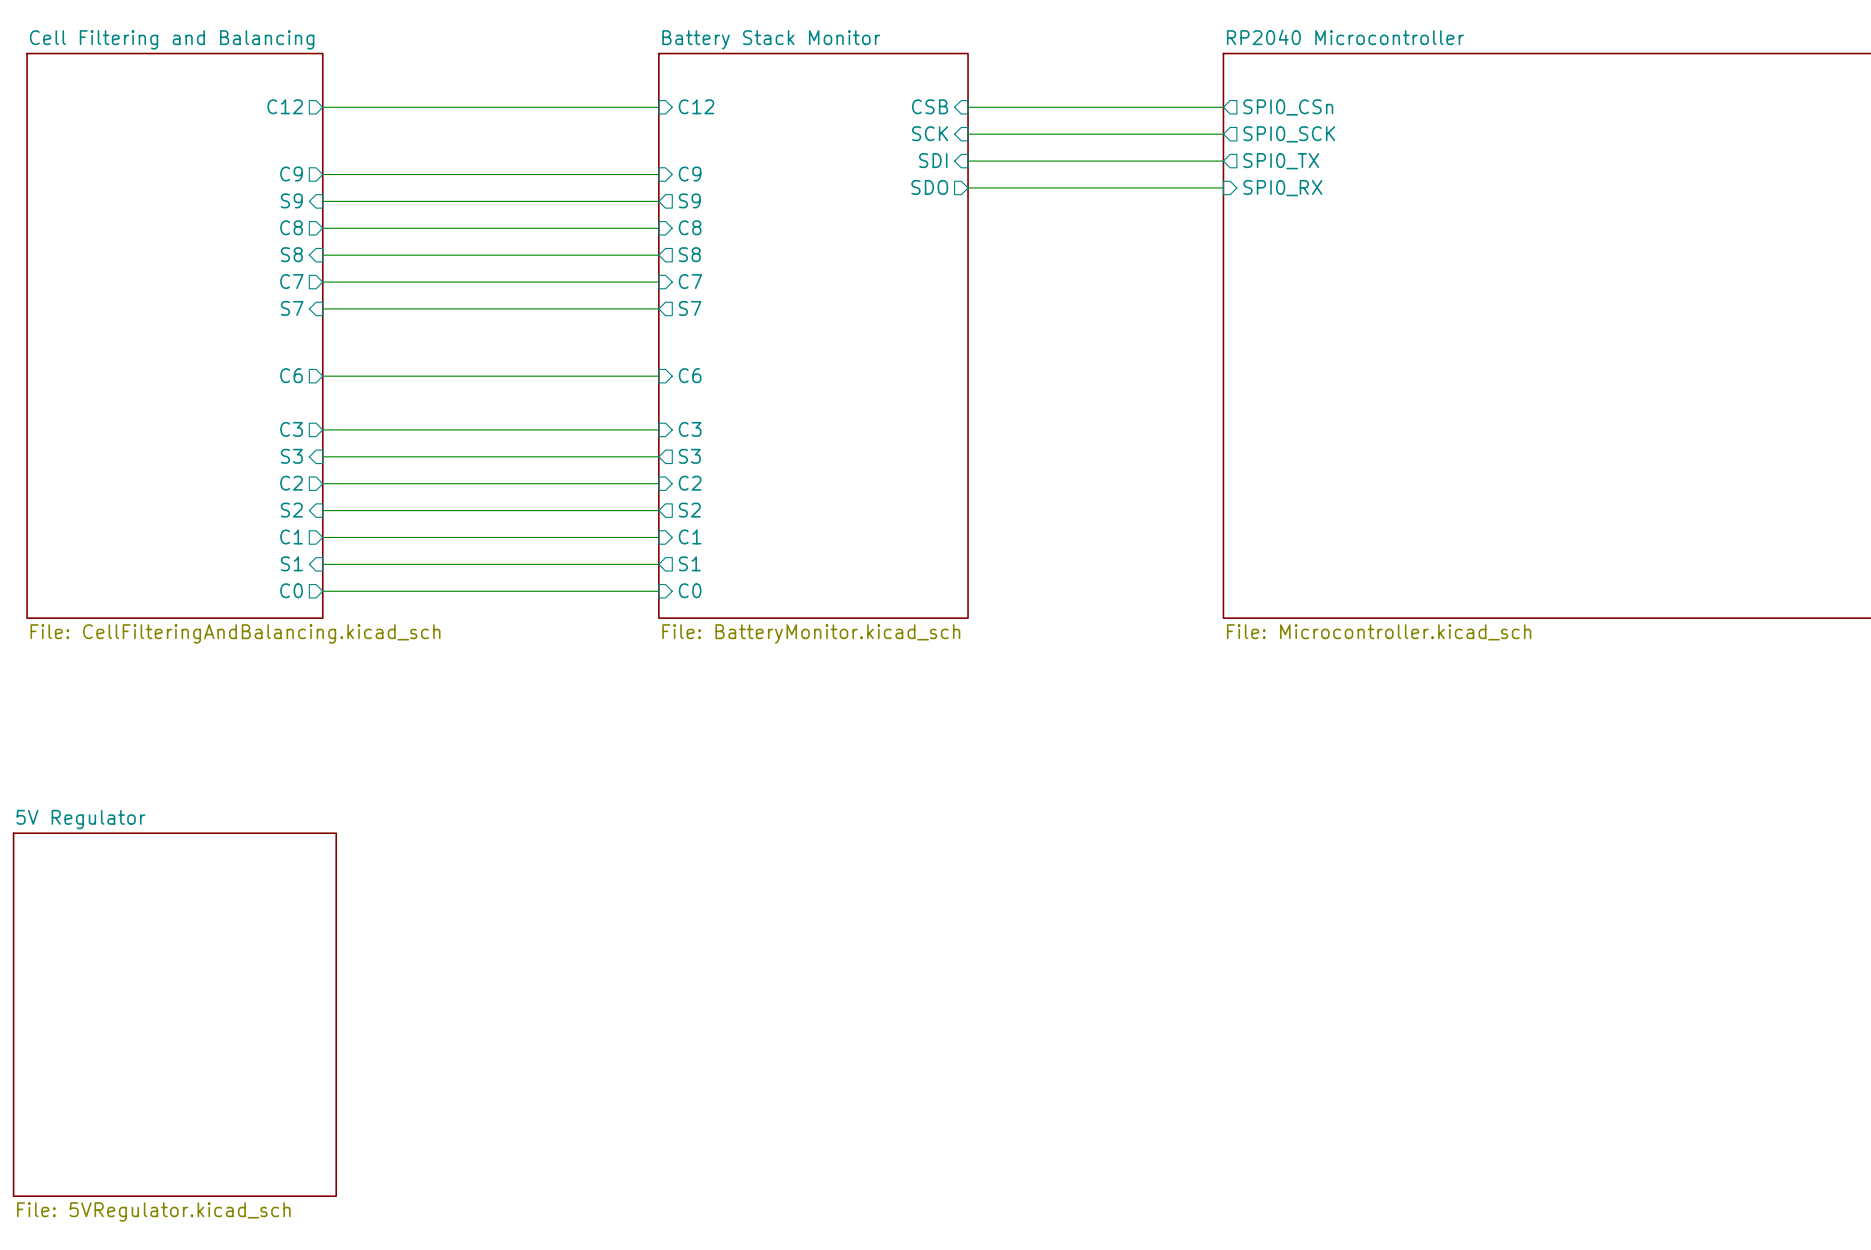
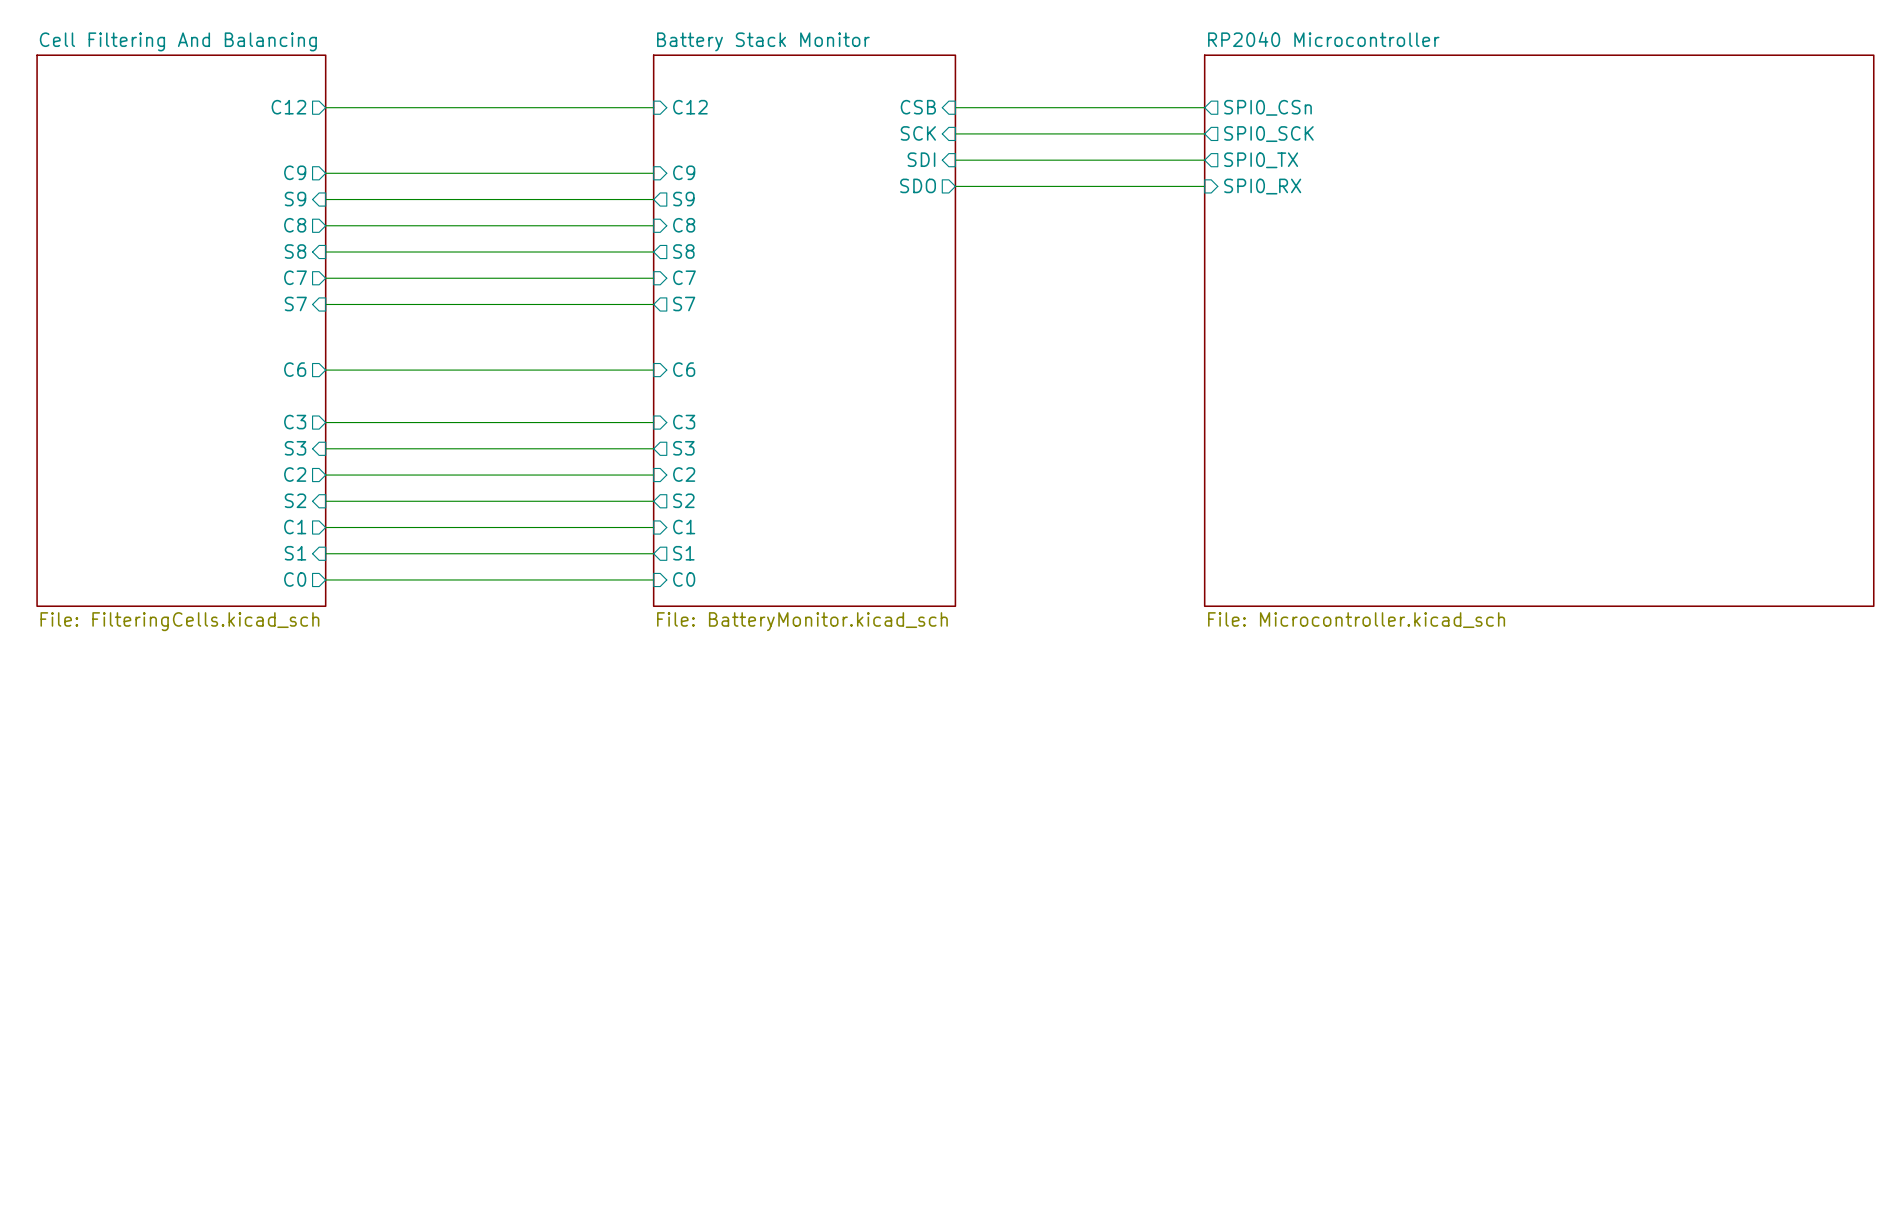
sheet Cell Filtering and Balancing name: Cell Filtering and Balancing (172, 39) -> Cell Filtering And Balancing (178, 41)
sheet Cell Filtering and Balancing value: File: CellFilteringAndBalancing.kicad_sch (235, 633) -> File: FilteringCells.kicad_sch (179, 621)
sheet 5V Regulator: File: 5VRegulator.kicad_sch (174, 1014) -> none

